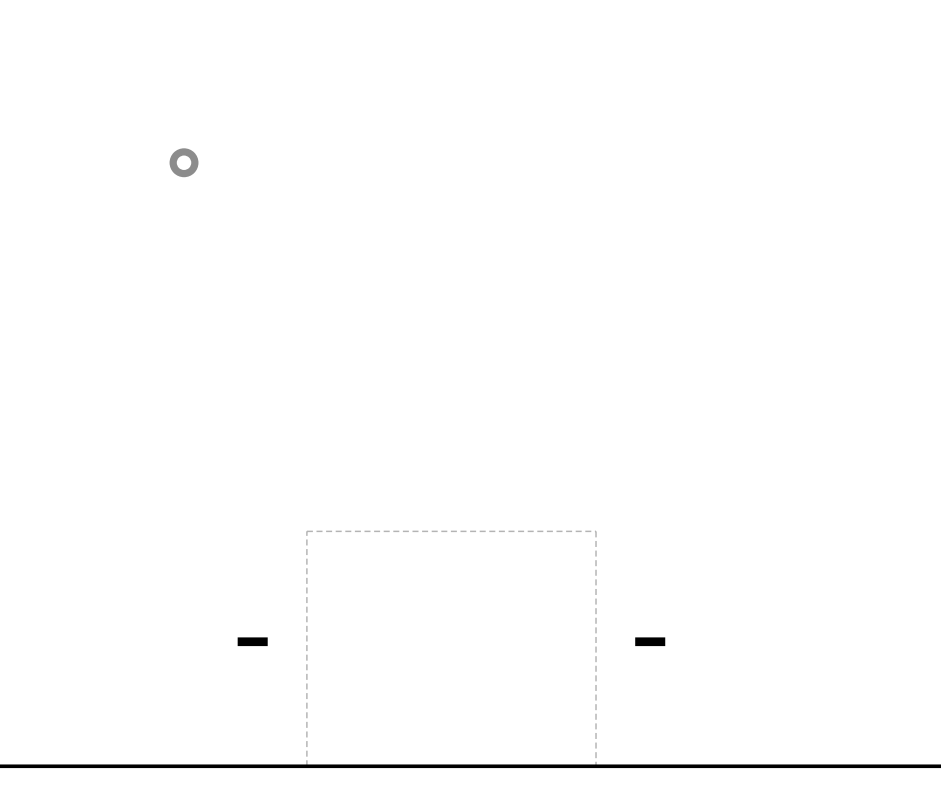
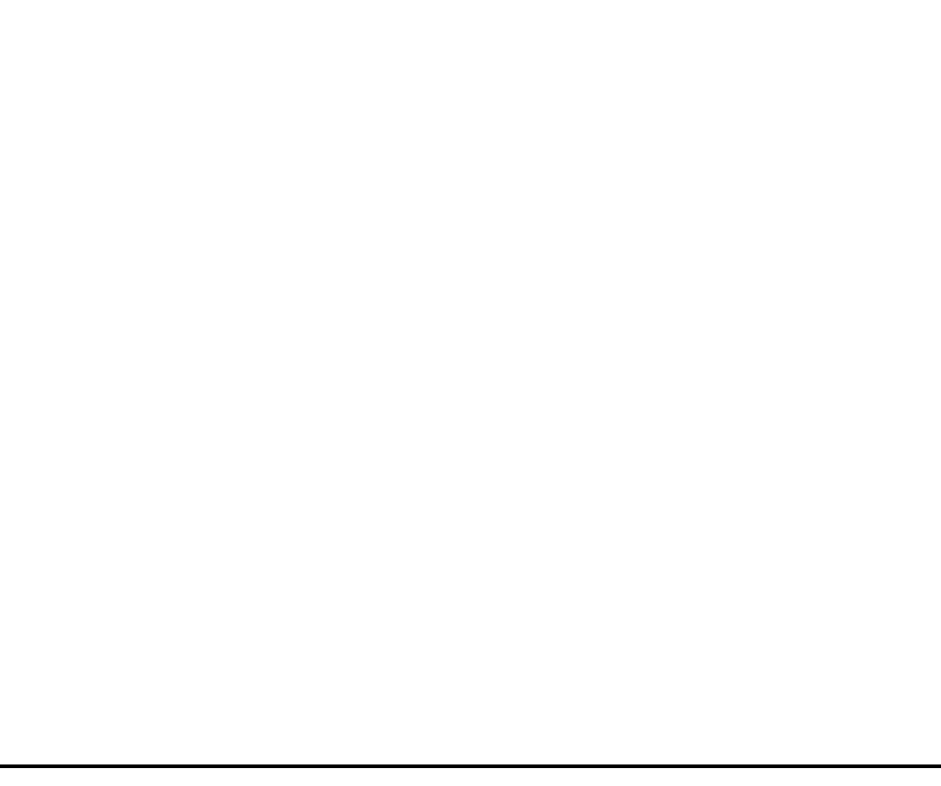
via: (184, 162) -> none
text: - (252, 641) -> none
text: - (650, 641) -> none
zone outline: (596, 766) (596, 531) (306, 531) (306, 766) -> none

